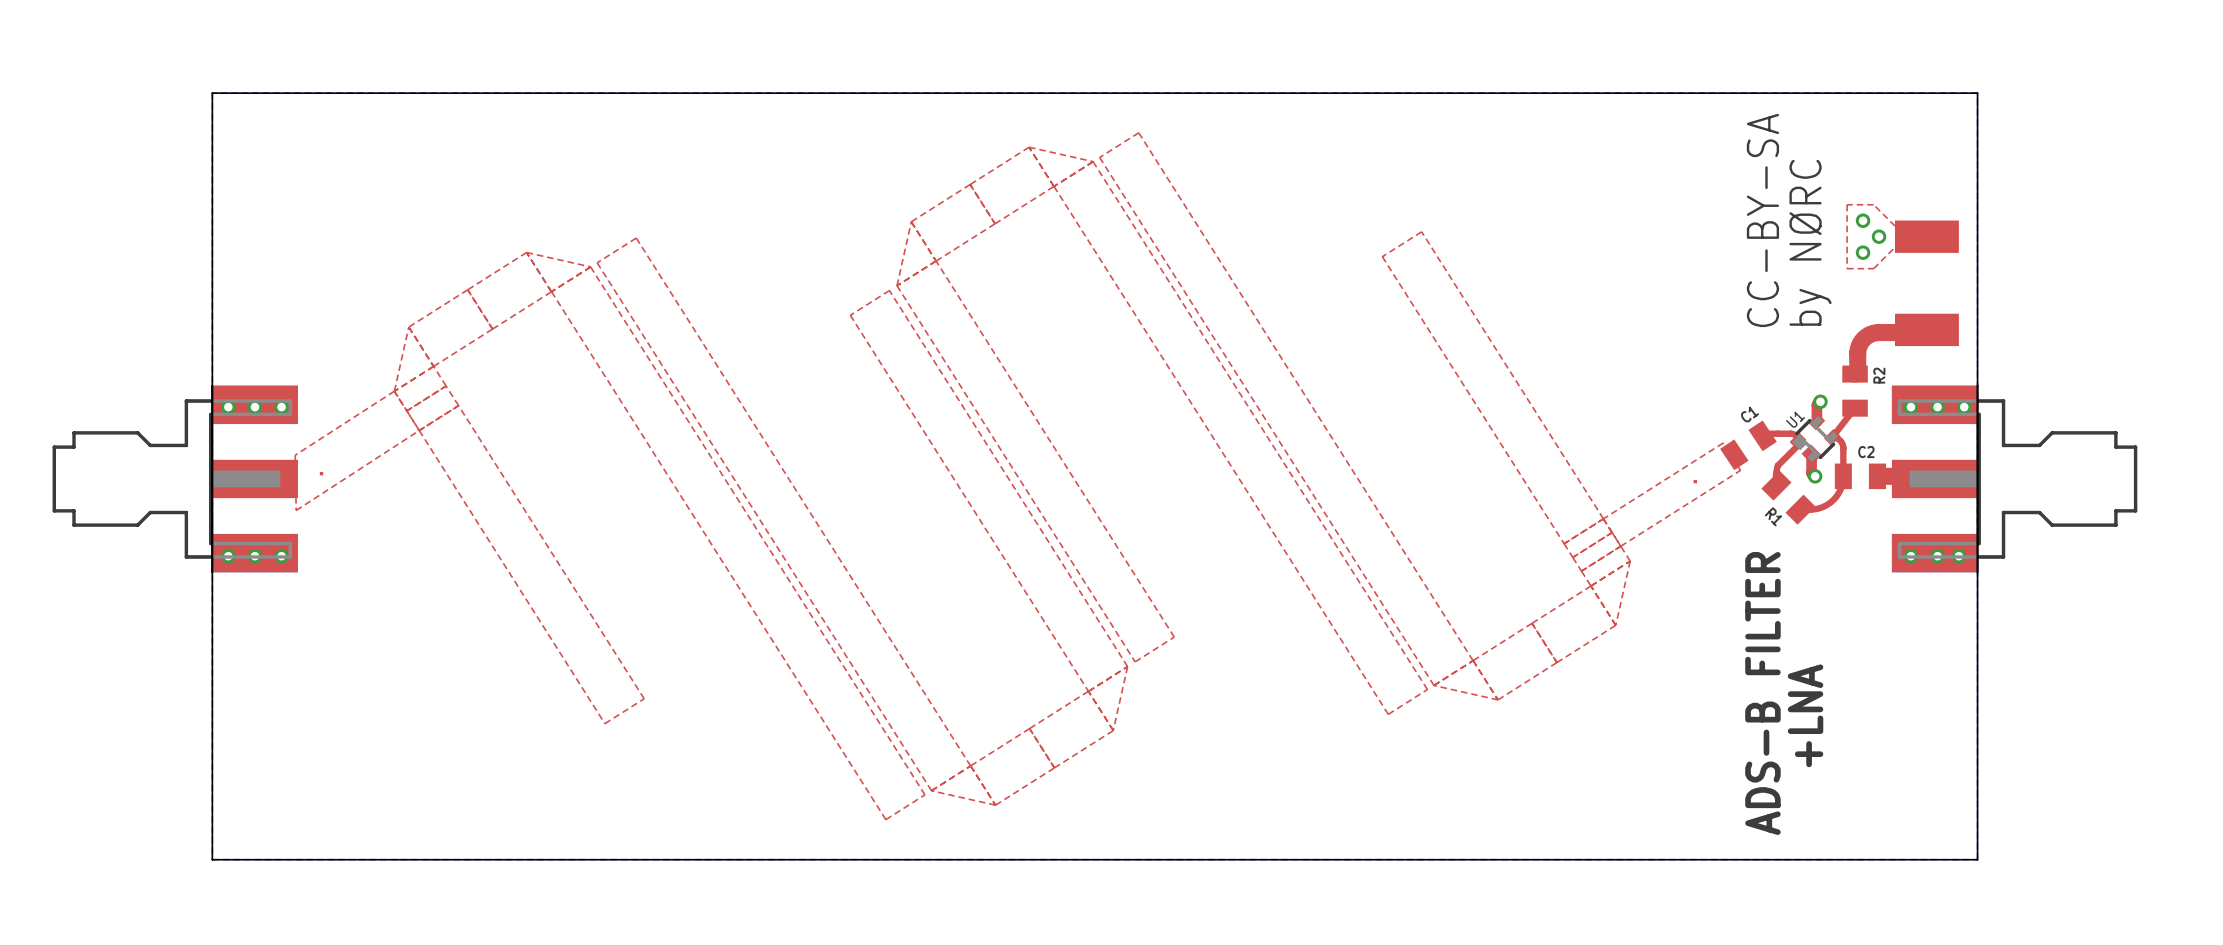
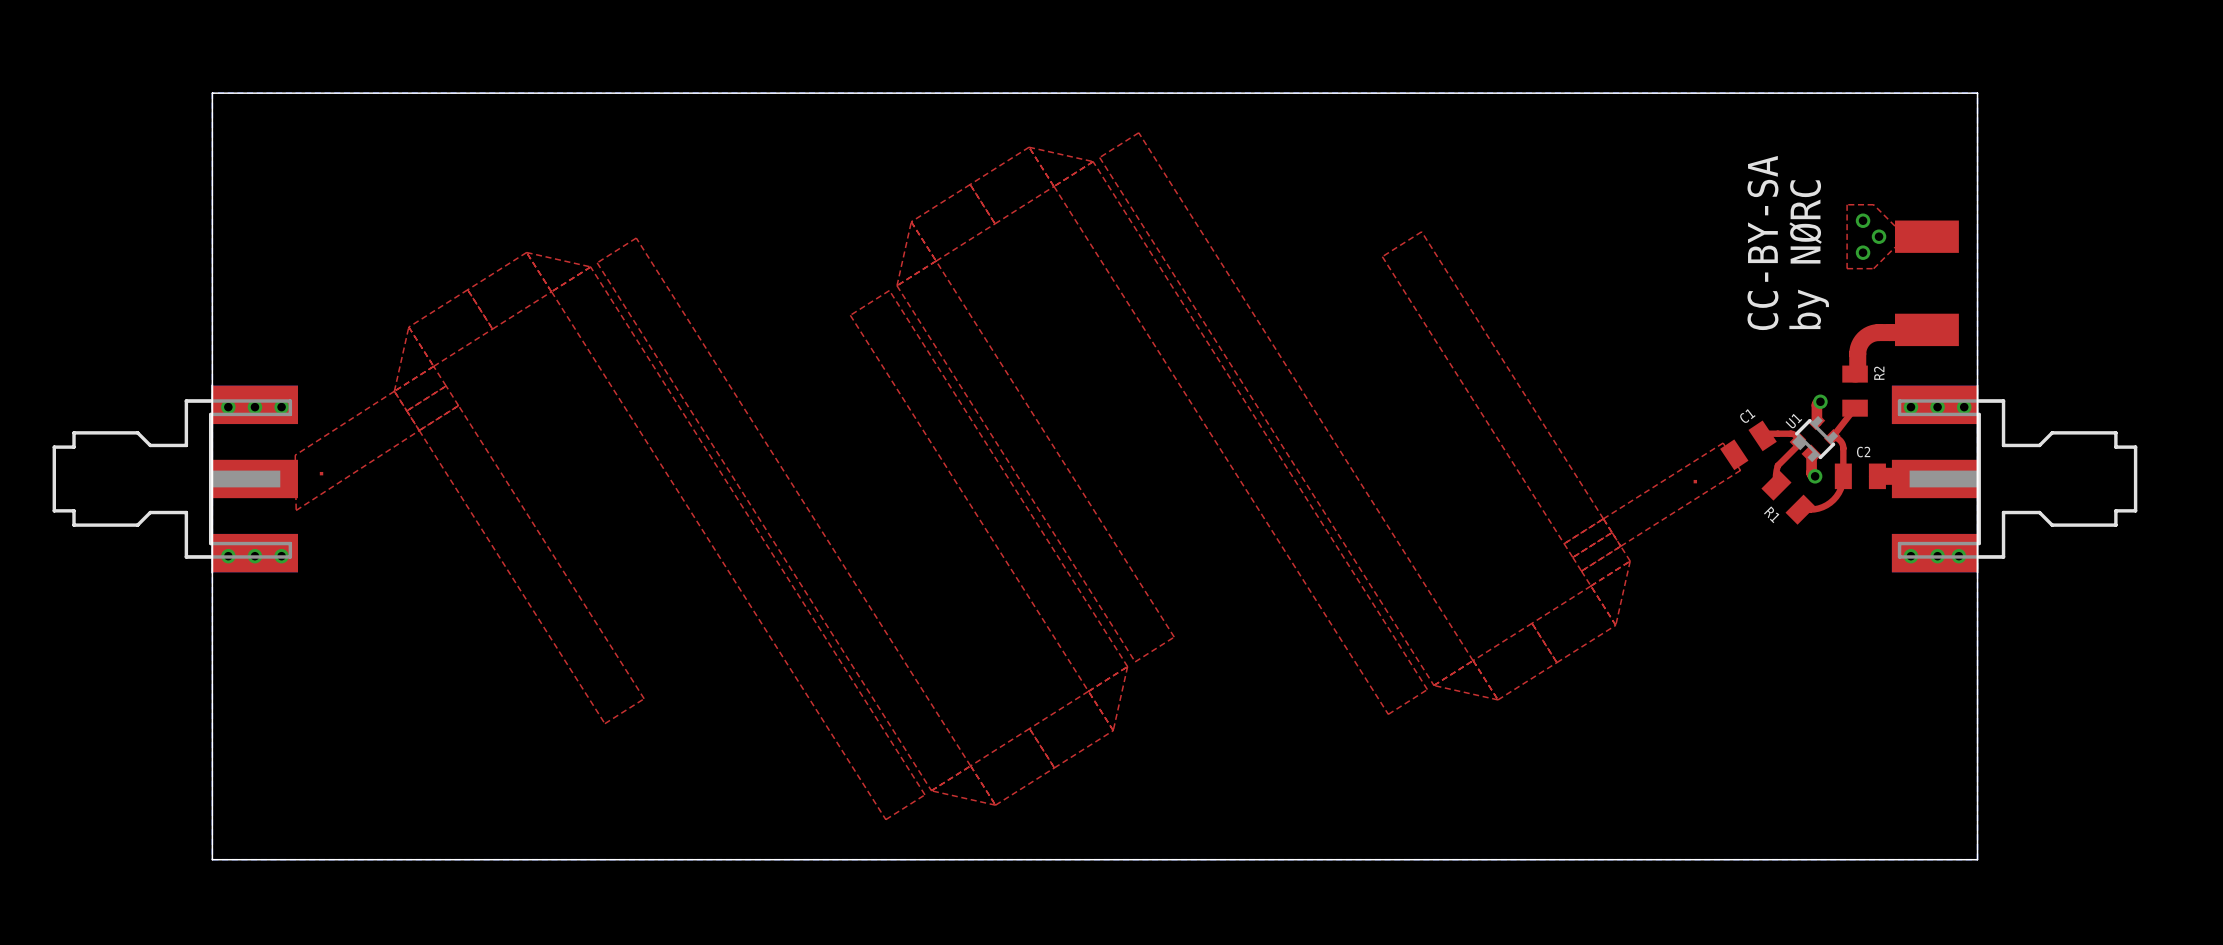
text: ADS-B FILTER (1762, 693) -> none
text: +LNA (1805, 715) -> none

